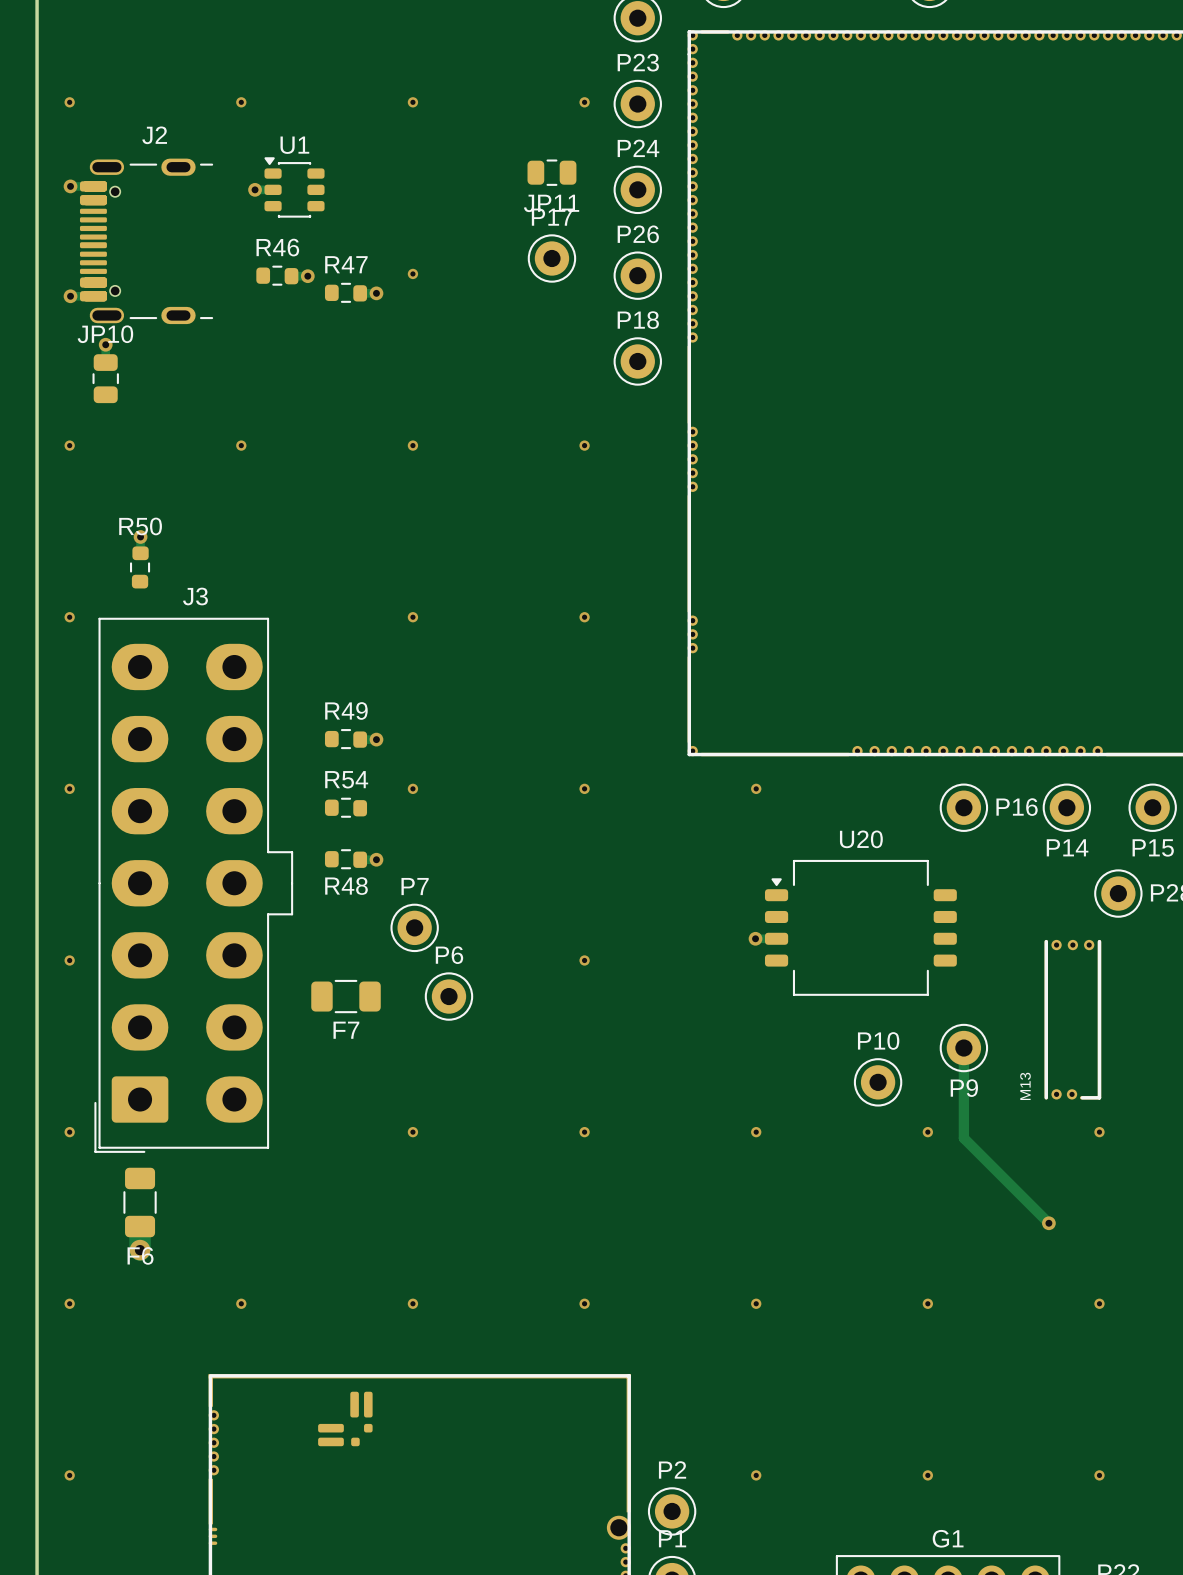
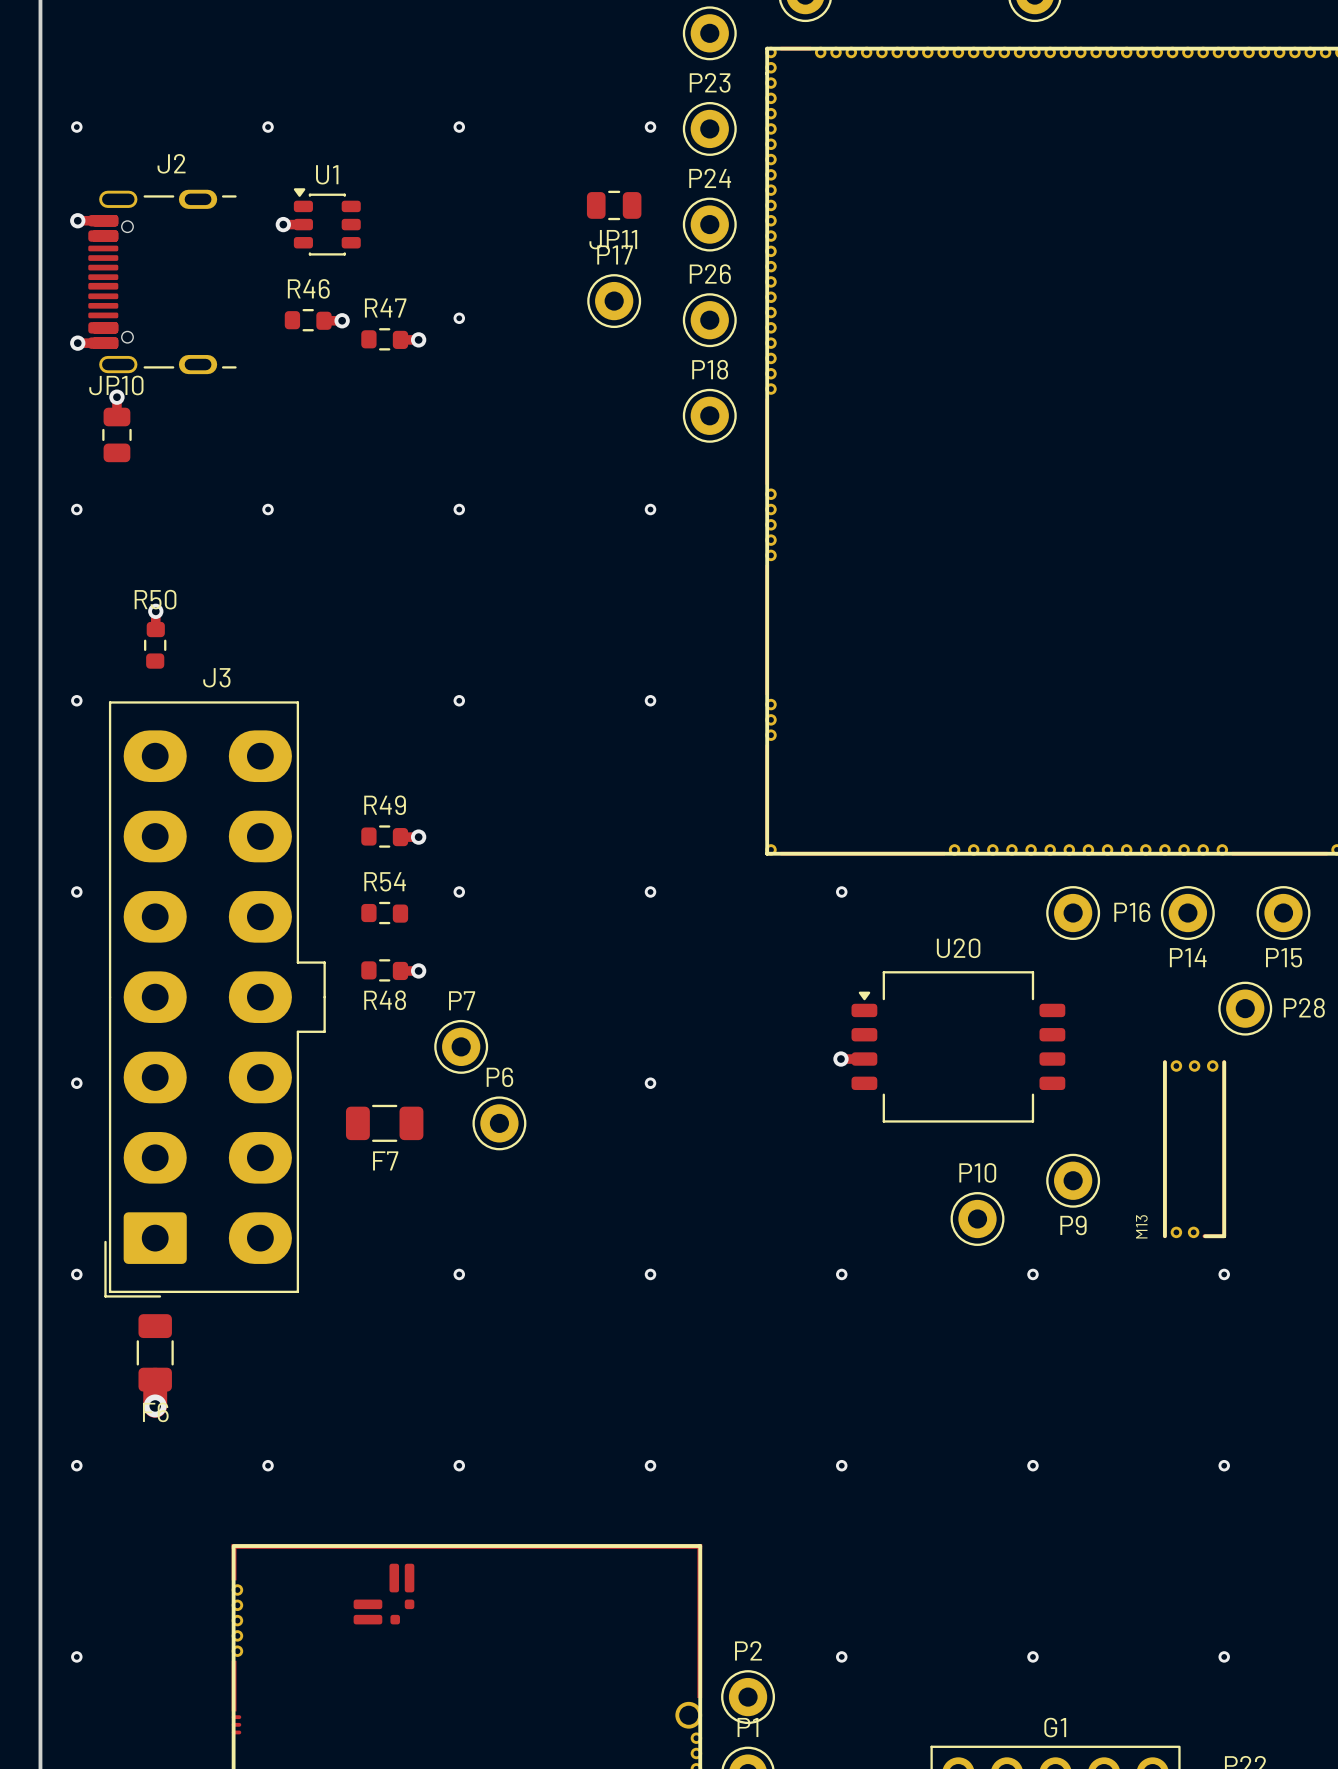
track: (963, 1048) (963, 1138) (1048, 1223) -> none
via: (1048, 1223) -> none

